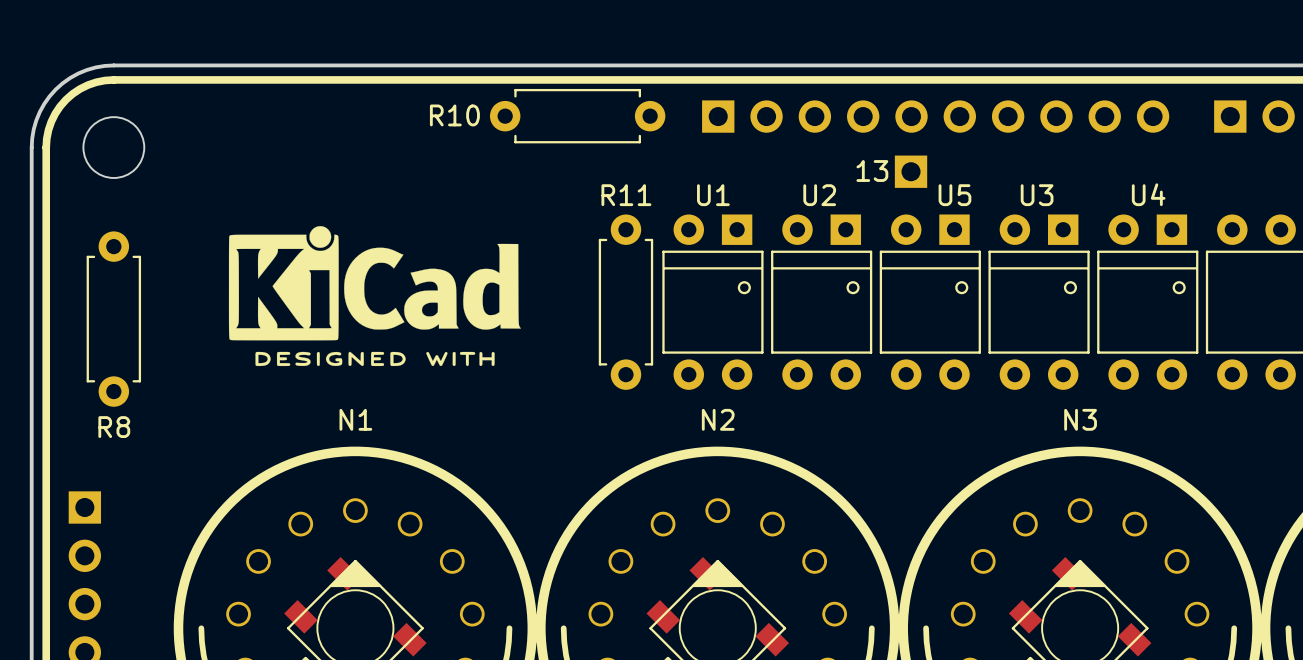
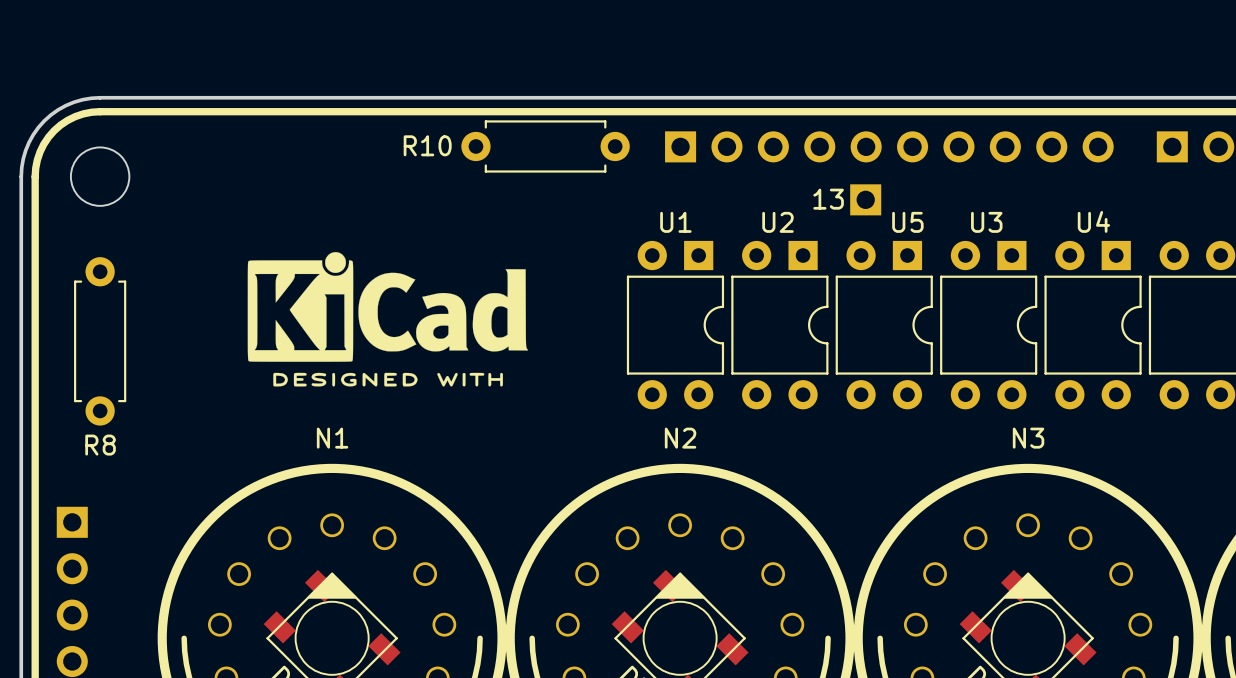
U1 footprint: [662, 214, 764, 390] -> [626, 240, 725, 410]
U2 footprint: [771, 214, 873, 390] -> [731, 240, 829, 410]
U5 footprint: [879, 214, 981, 390] -> [835, 240, 933, 410]
U3 footprint: [988, 214, 1090, 390] -> [940, 240, 1038, 410]
U4 footprint: [1097, 214, 1199, 390] -> [1044, 240, 1142, 410]
drawing position: (374, 296) -> (387, 319)
R11: (625, 302) -> none

